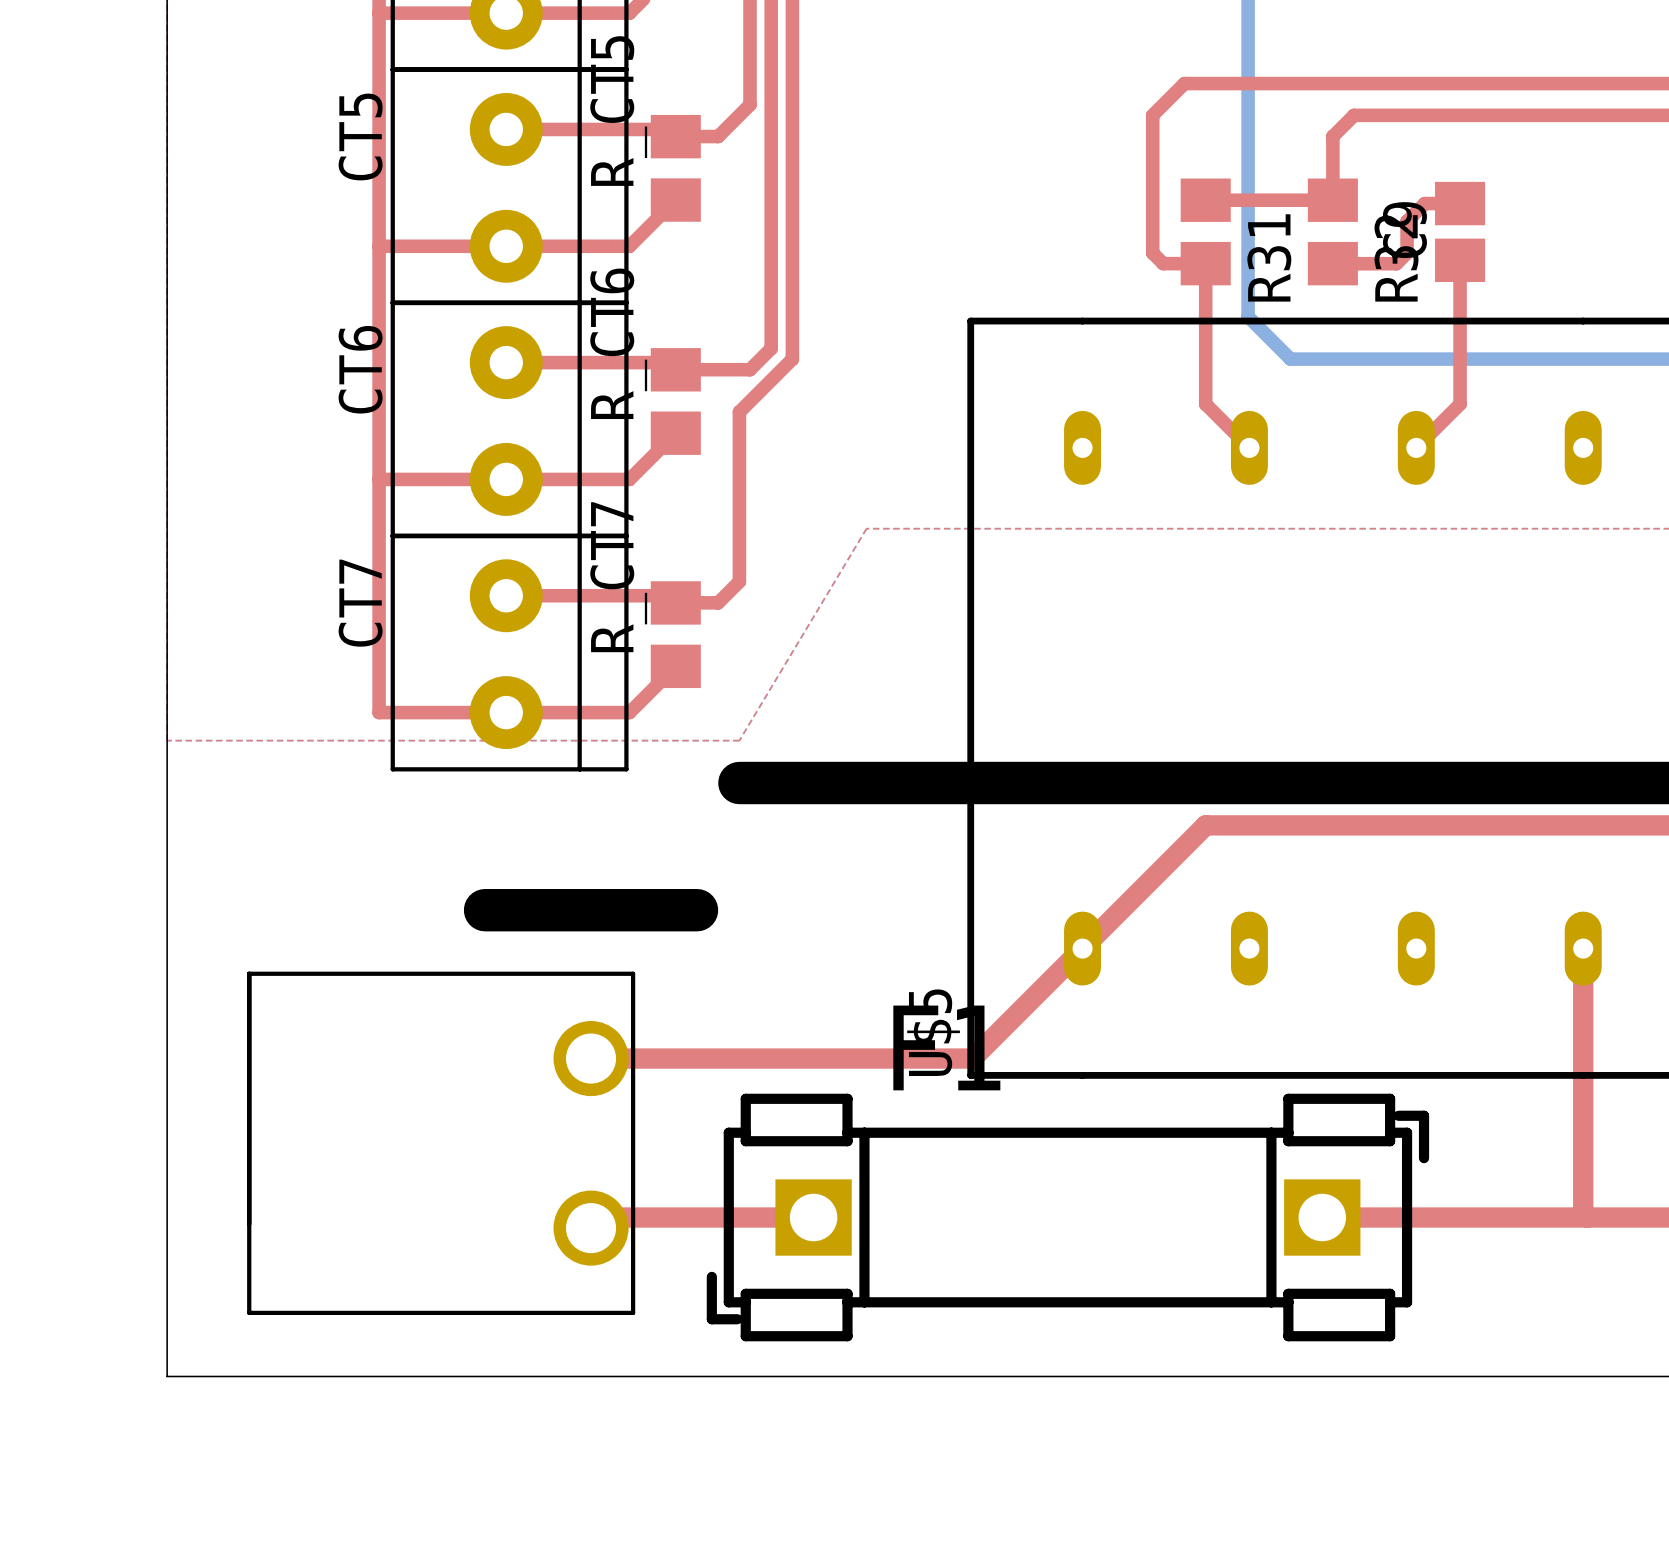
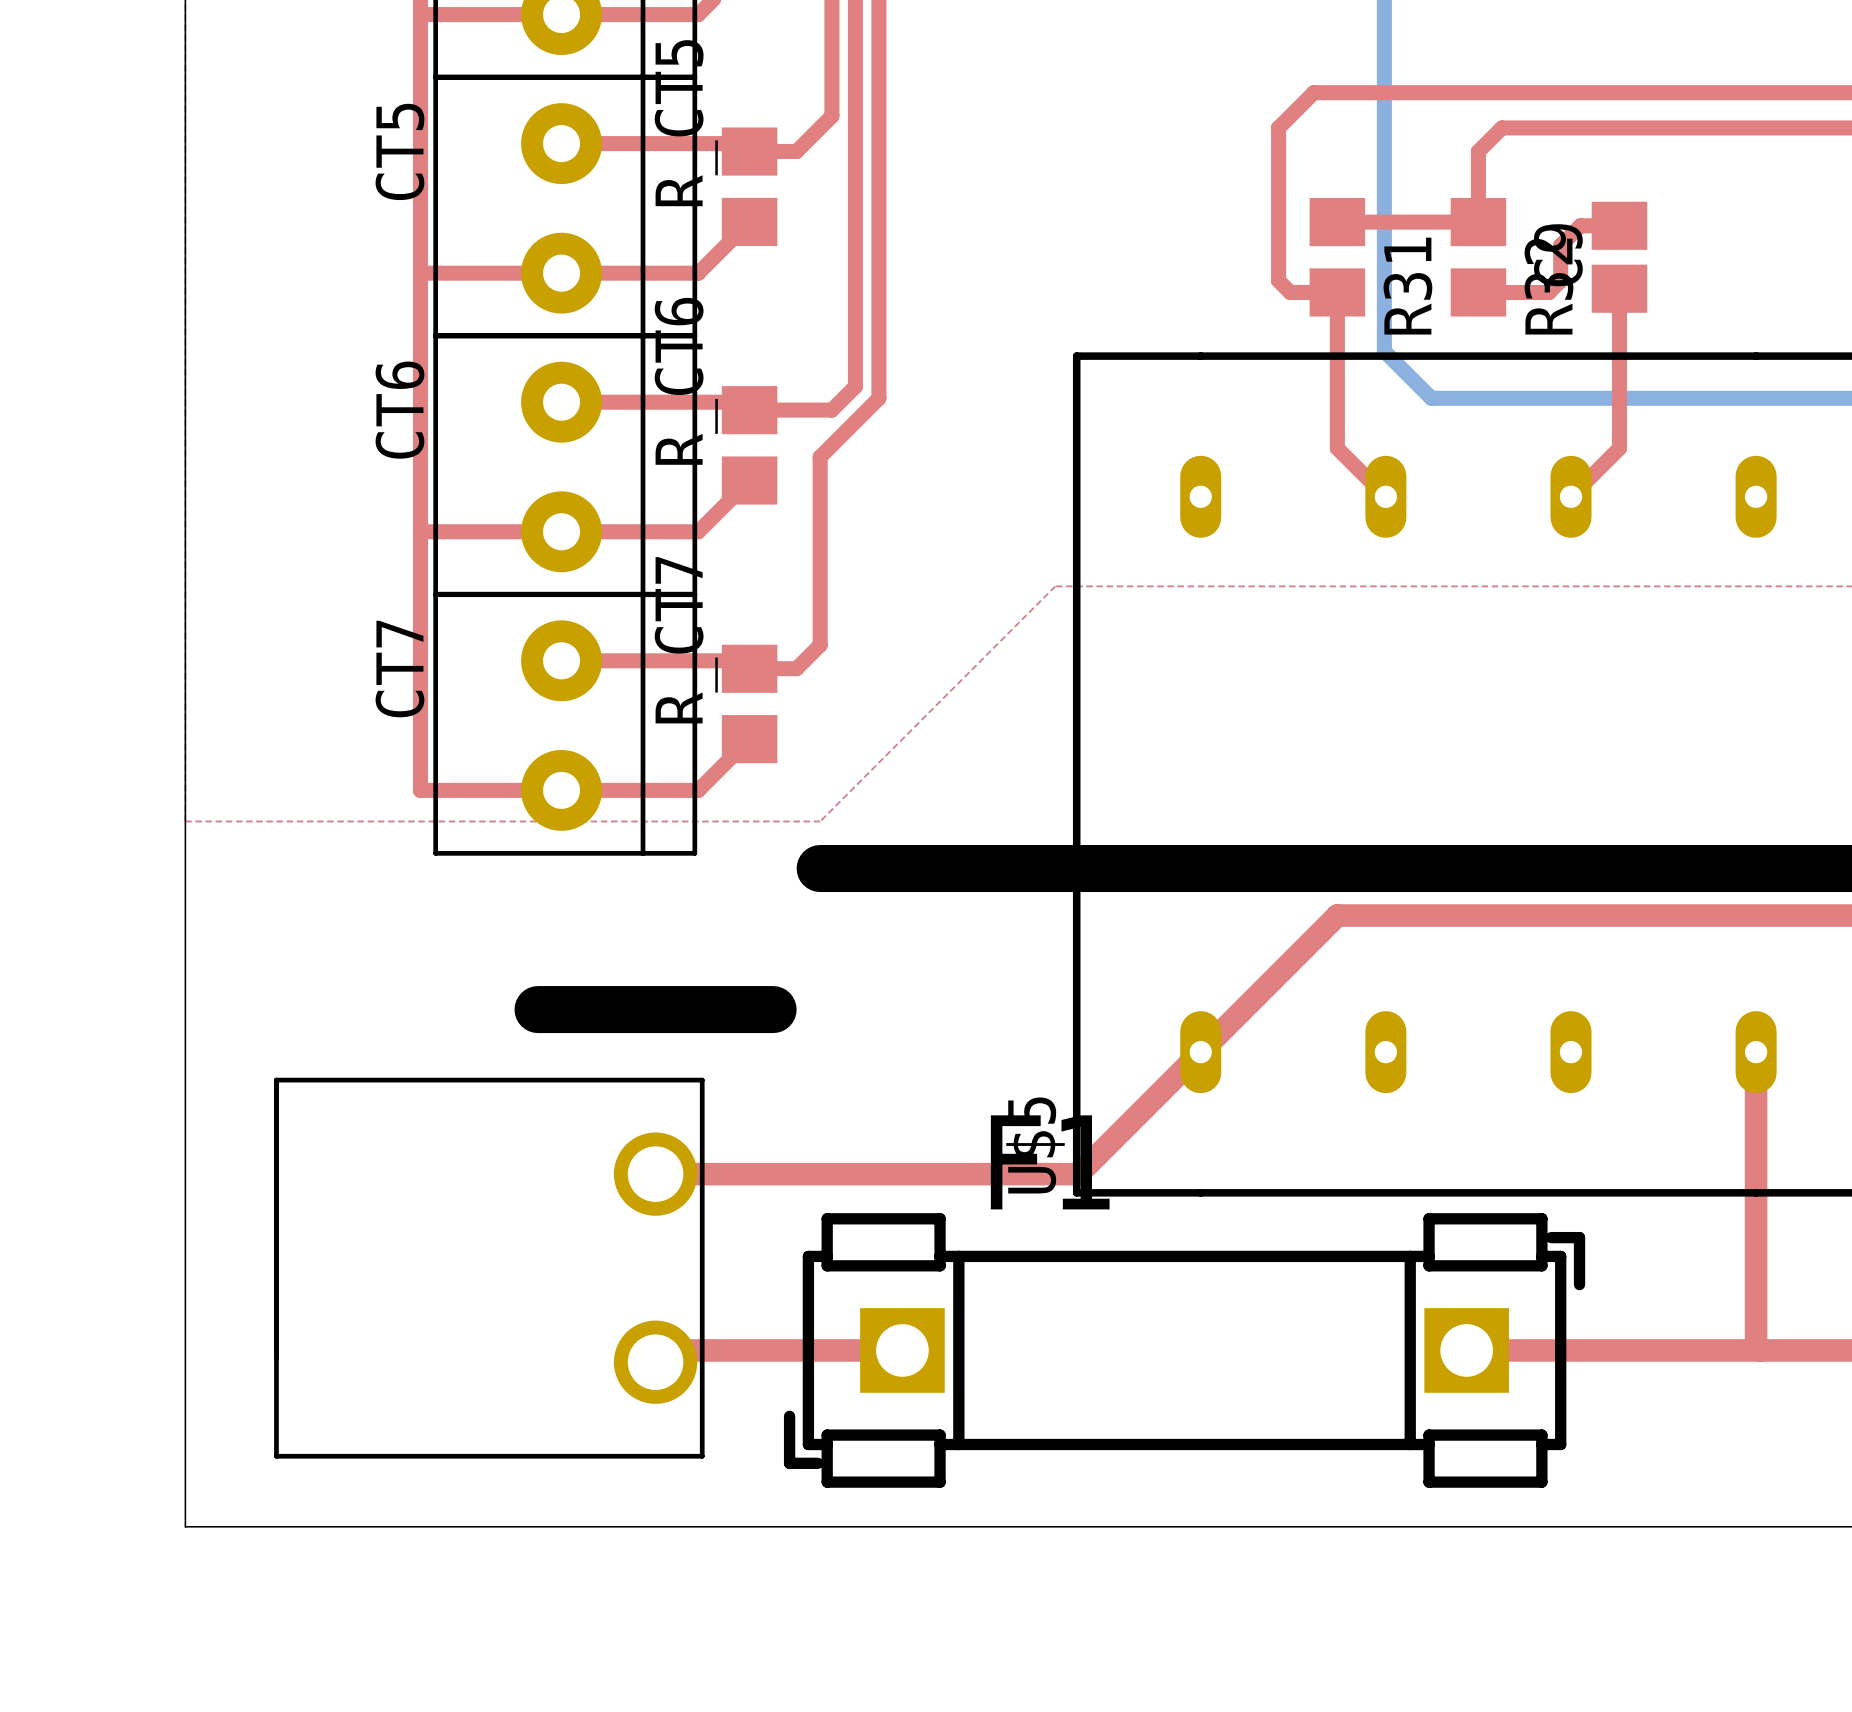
top zone outline: (951, 528) (866, 528) (739, 740) -> (1055, 586) (820, 821)

